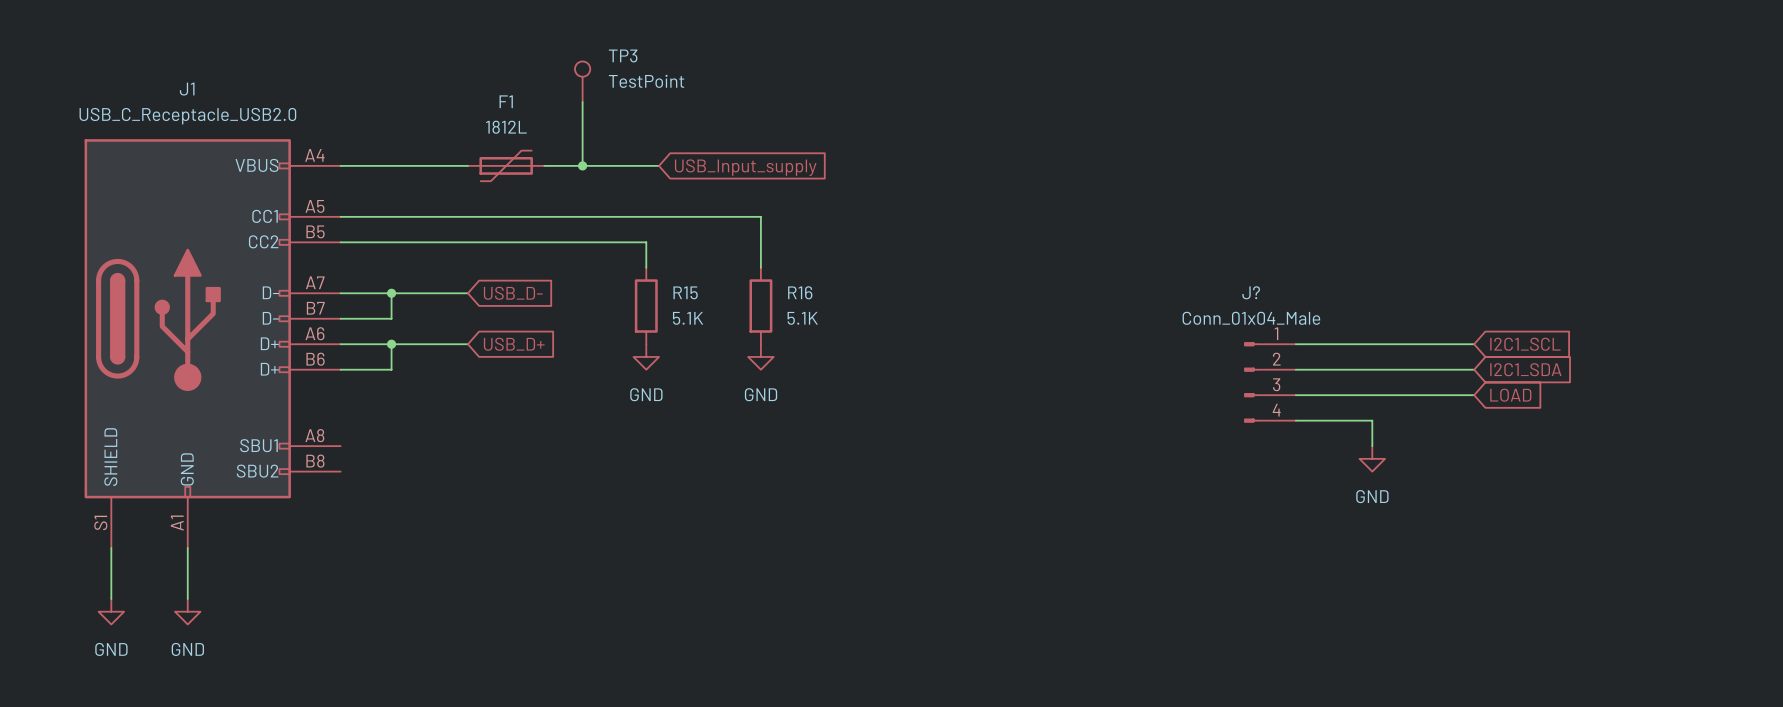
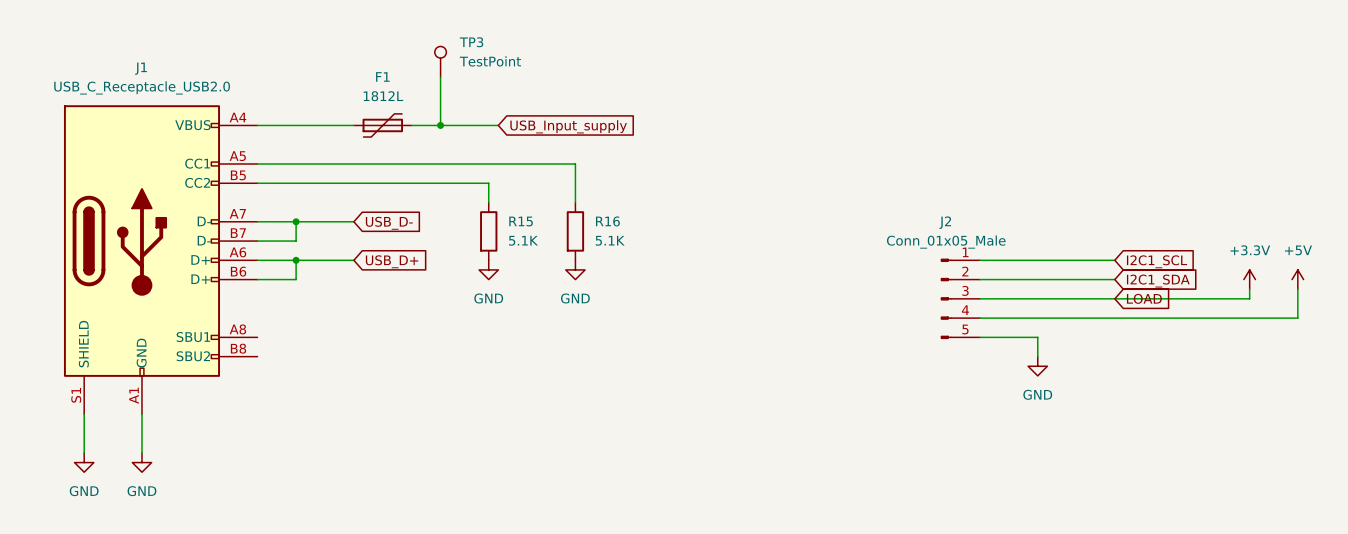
power symbol: none -> +3.3V (1249, 279)
power symbol: none -> +5V (1297, 279)
J?: Conn_01x04_Male (1270, 382) -> none
wire: none -> (1249, 289) (1249, 298) (1114, 298)
J2: none -> Conn_01x05_Male (960, 298)
wire: (1372, 420) (1372, 446) -> (1037, 318) (1297, 318) (1297, 289)
wire: none -> (979, 337) (1037, 337) (1037, 356)
power symbol position: GND (1372, 458) -> GND (1037, 366)

